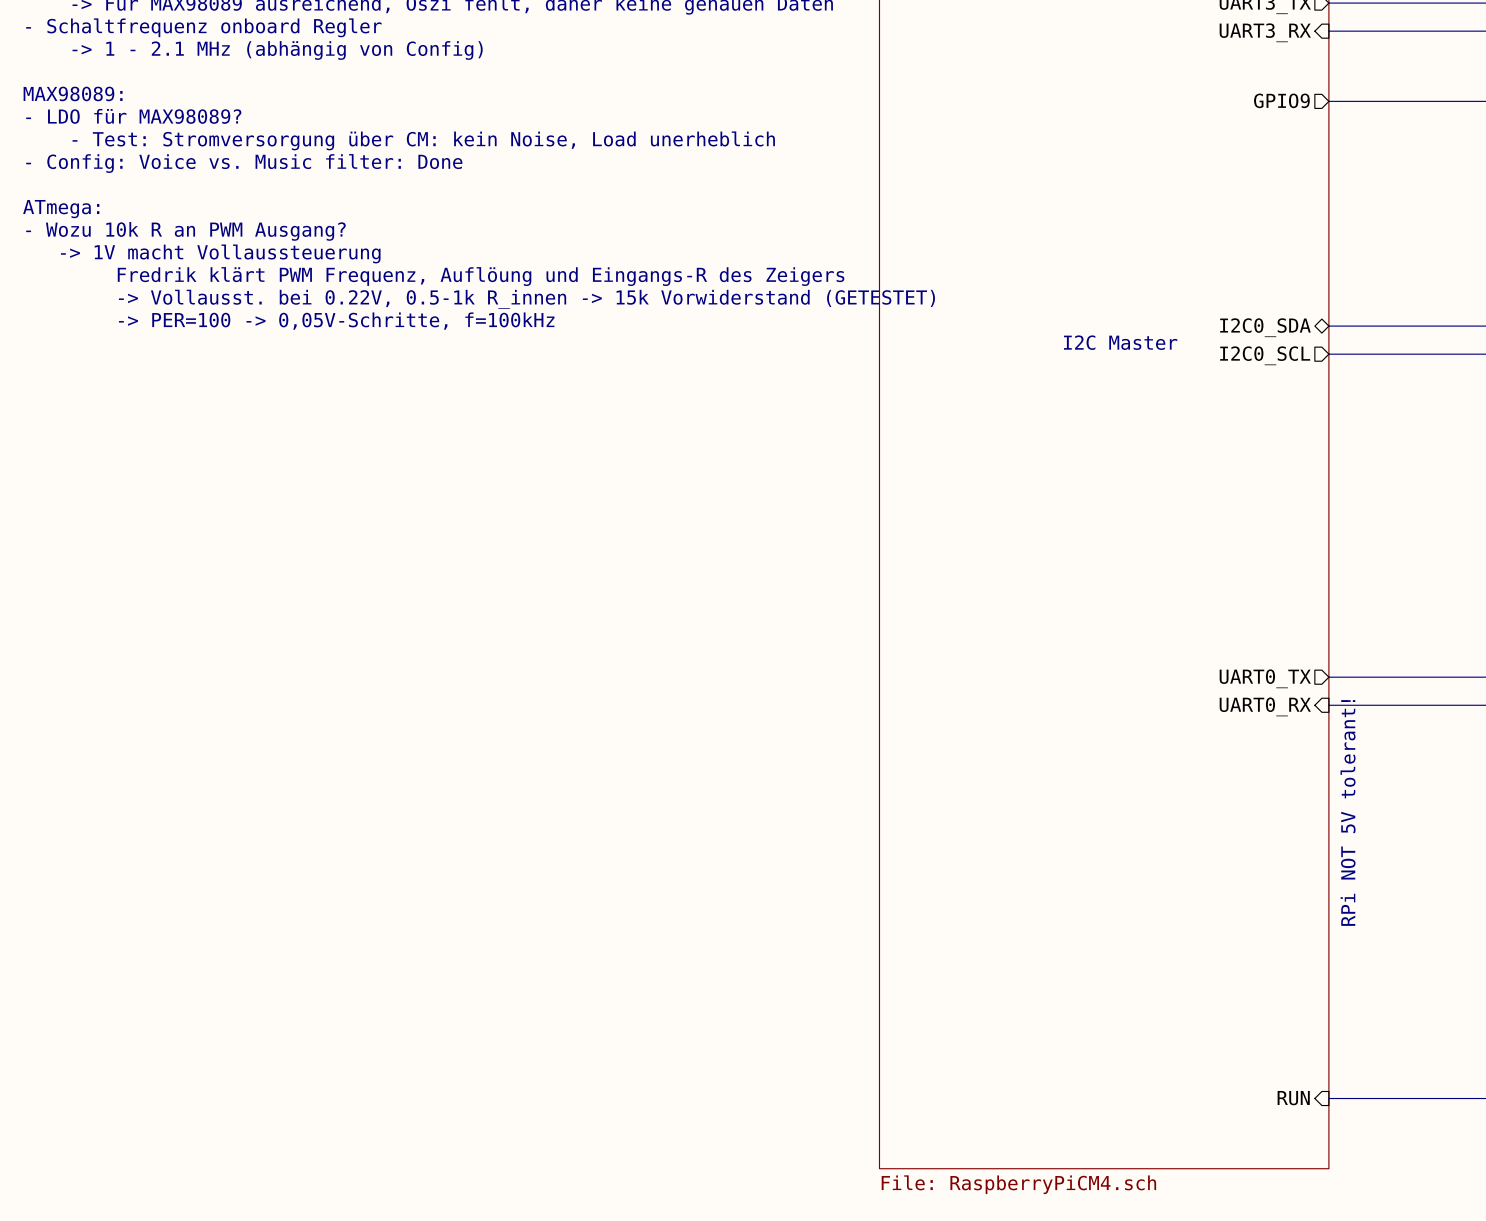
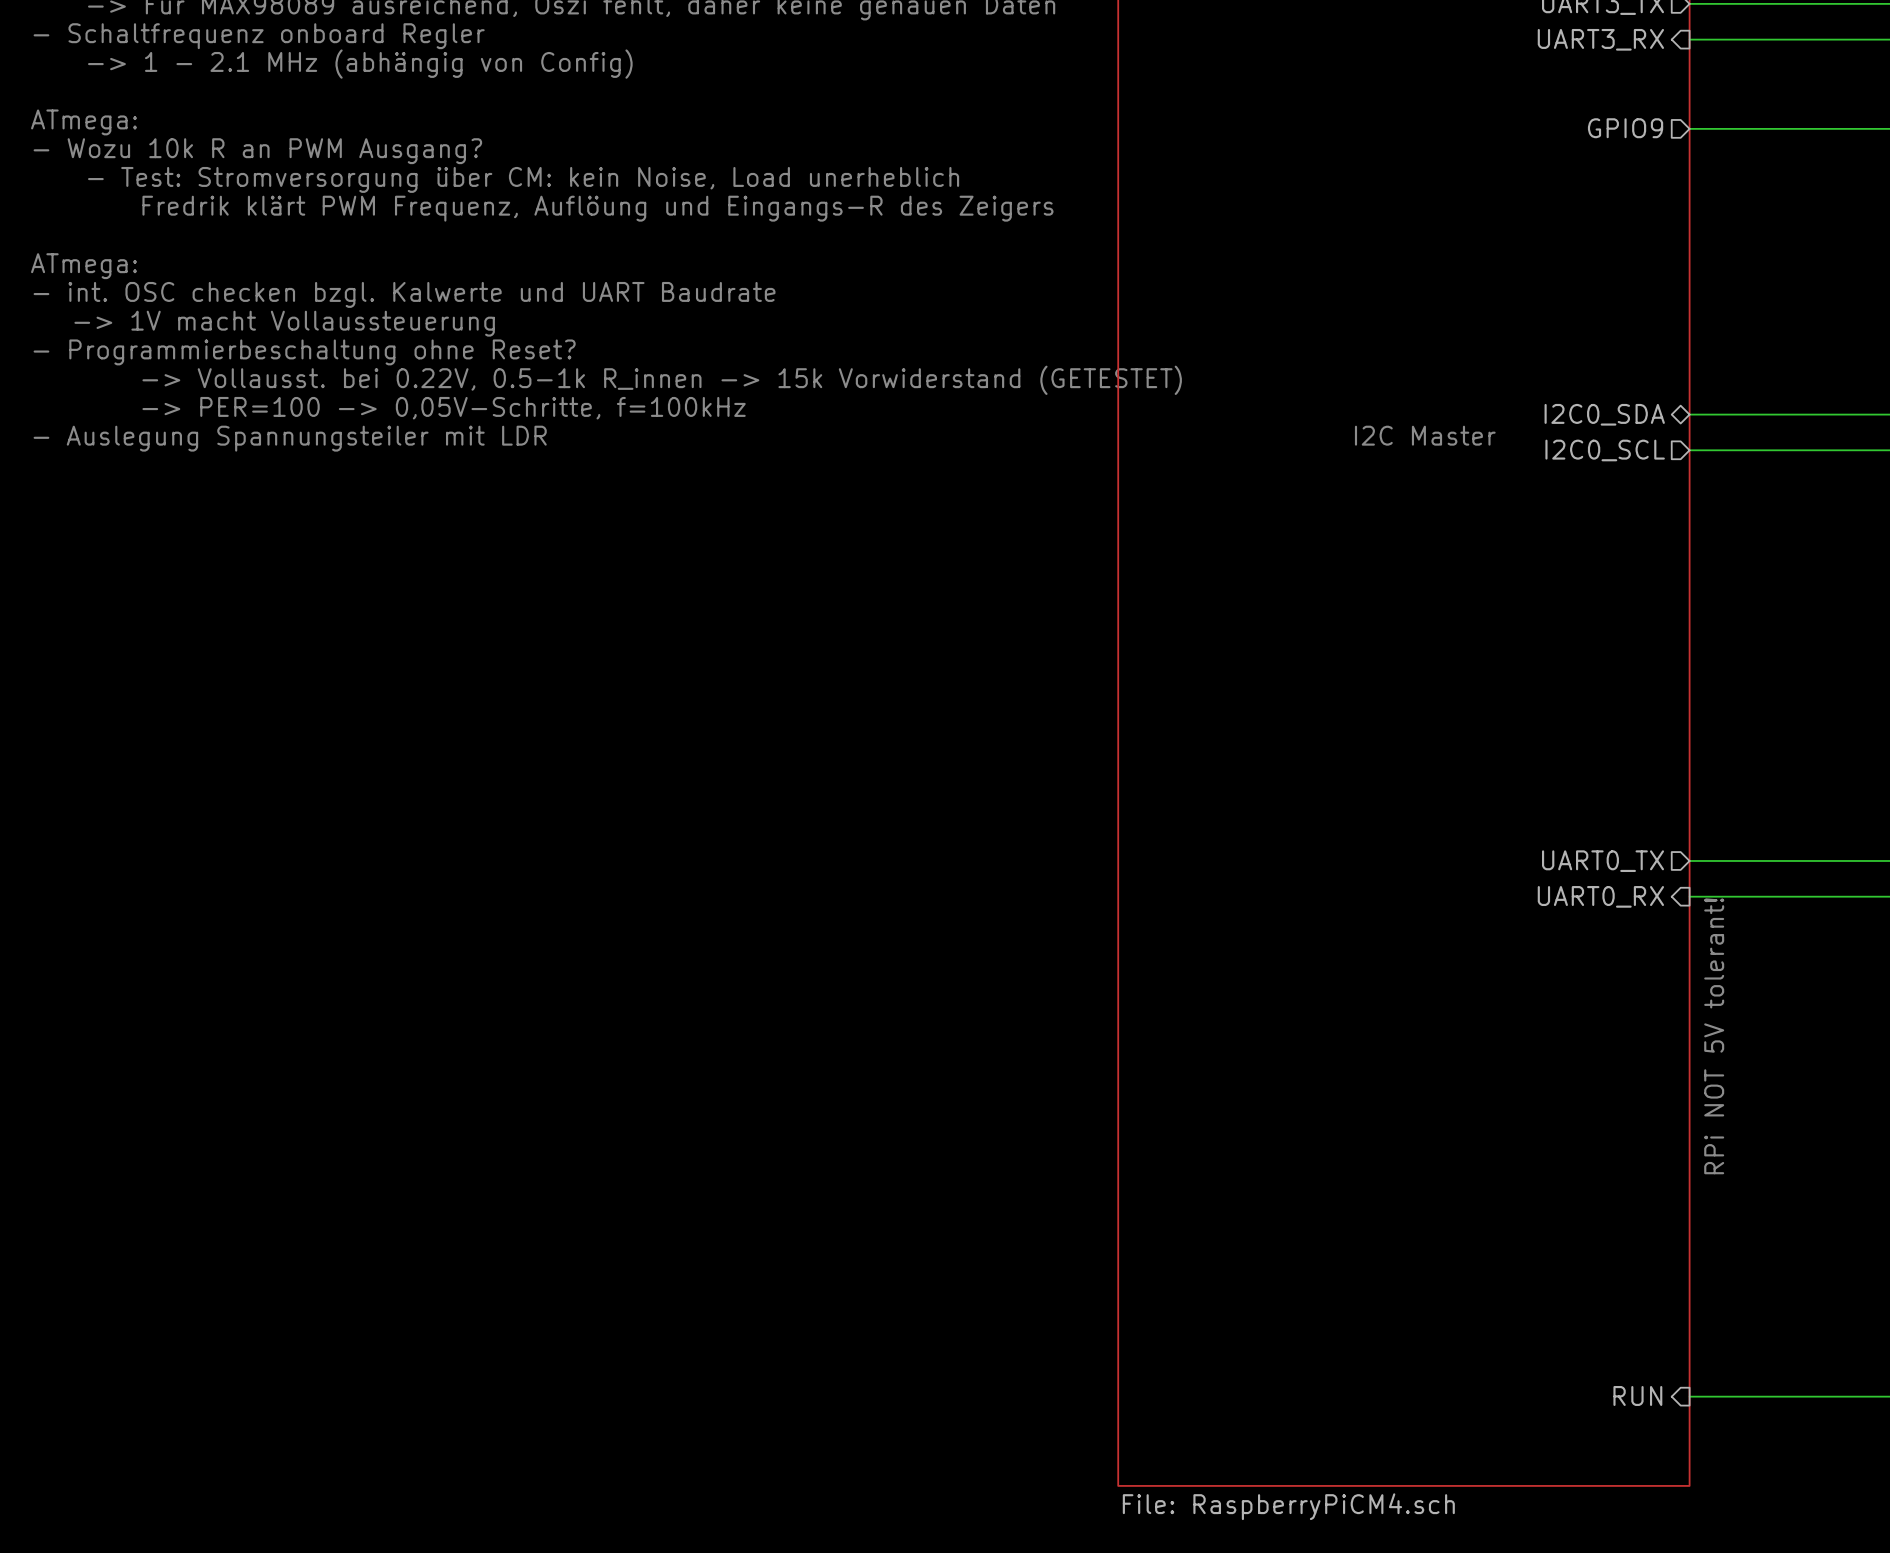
text: MAX98089: (73, 93) -> ATmega: (83, 122)
text: - LDO für MAX98089? (133, 116) -> - Wozu 10k R an PWM Ausgang? (257, 151)
text: - Config: Voice vs. Music filter: Done (244, 163) -> Fredrik klärt PWM Frequenz, Auflöung und Eingangs-R des Zeigers (597, 208)
text: - Wozu 10k R an PWM Ausgang? (185, 231) -> - int. OSC checken bzgl. Kalwerte und UART Baudrate (404, 294)
text: Fredrik klärt PWM Frequenz, Auflöung und Eingangs-R des Zeigers (481, 276) -> - Programmierbeschaltung ohne Reset? (304, 352)
text: none -> - Auslegung Spannungsteiler mit LDR (290, 438)

